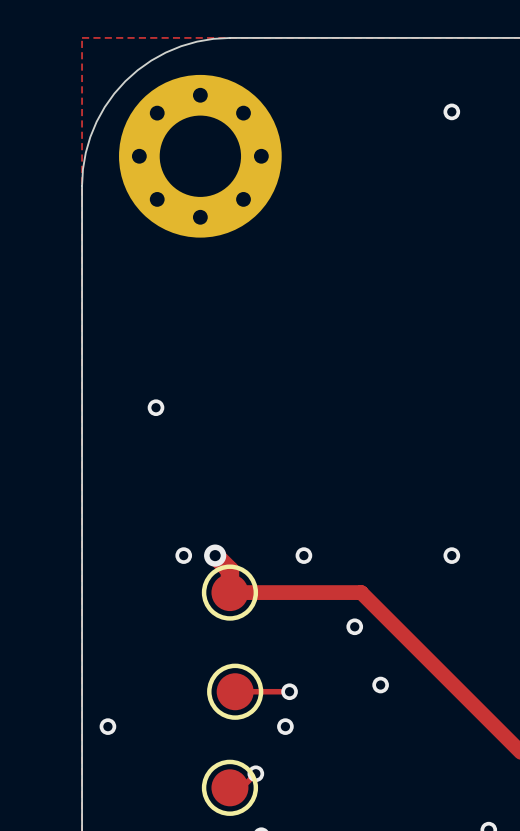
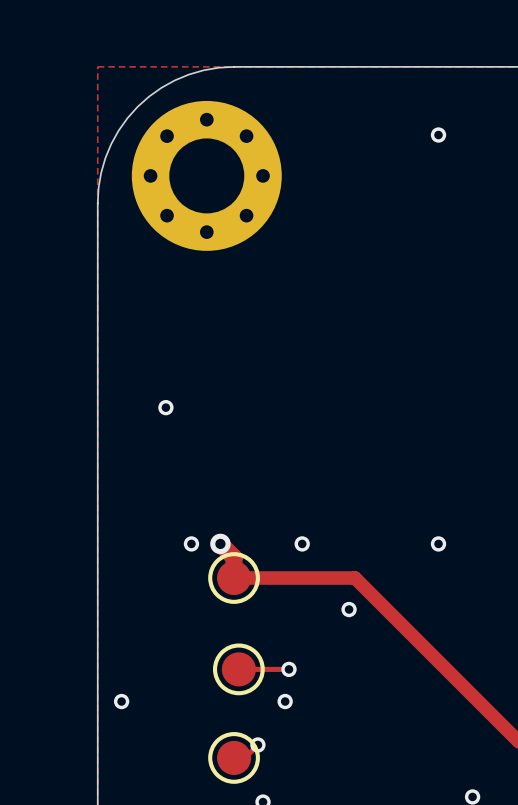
via: (380, 685) -> none

